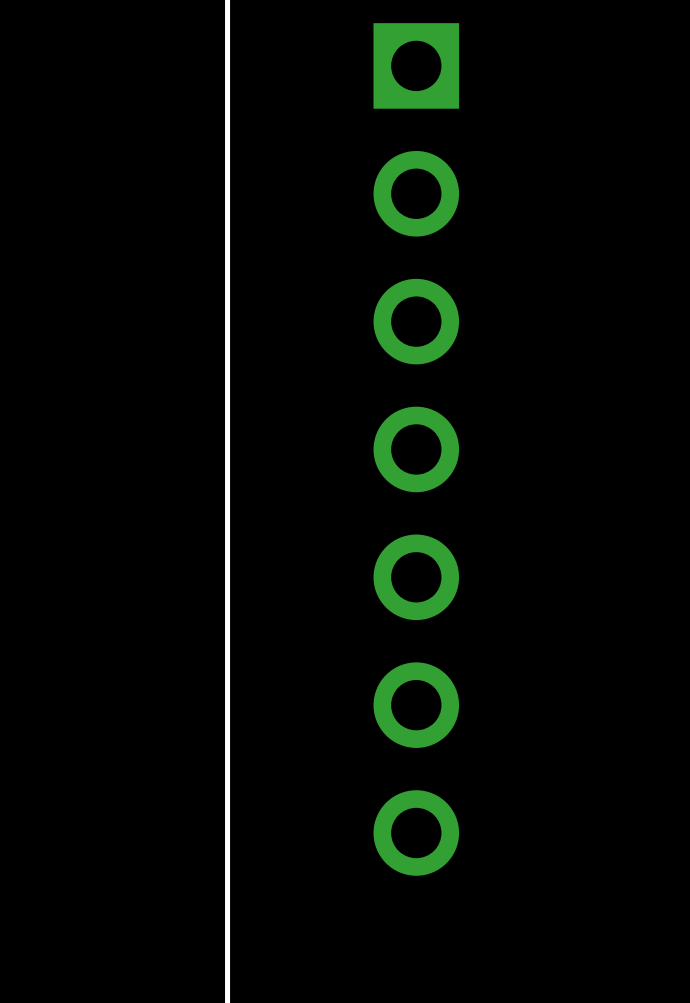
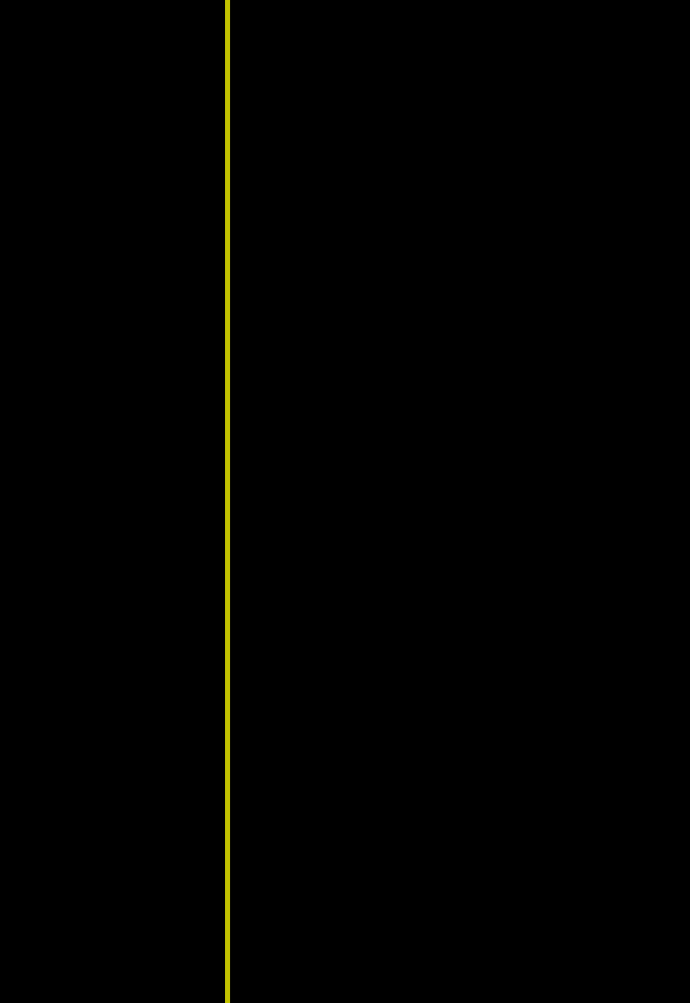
part: (416, 449) -> none

